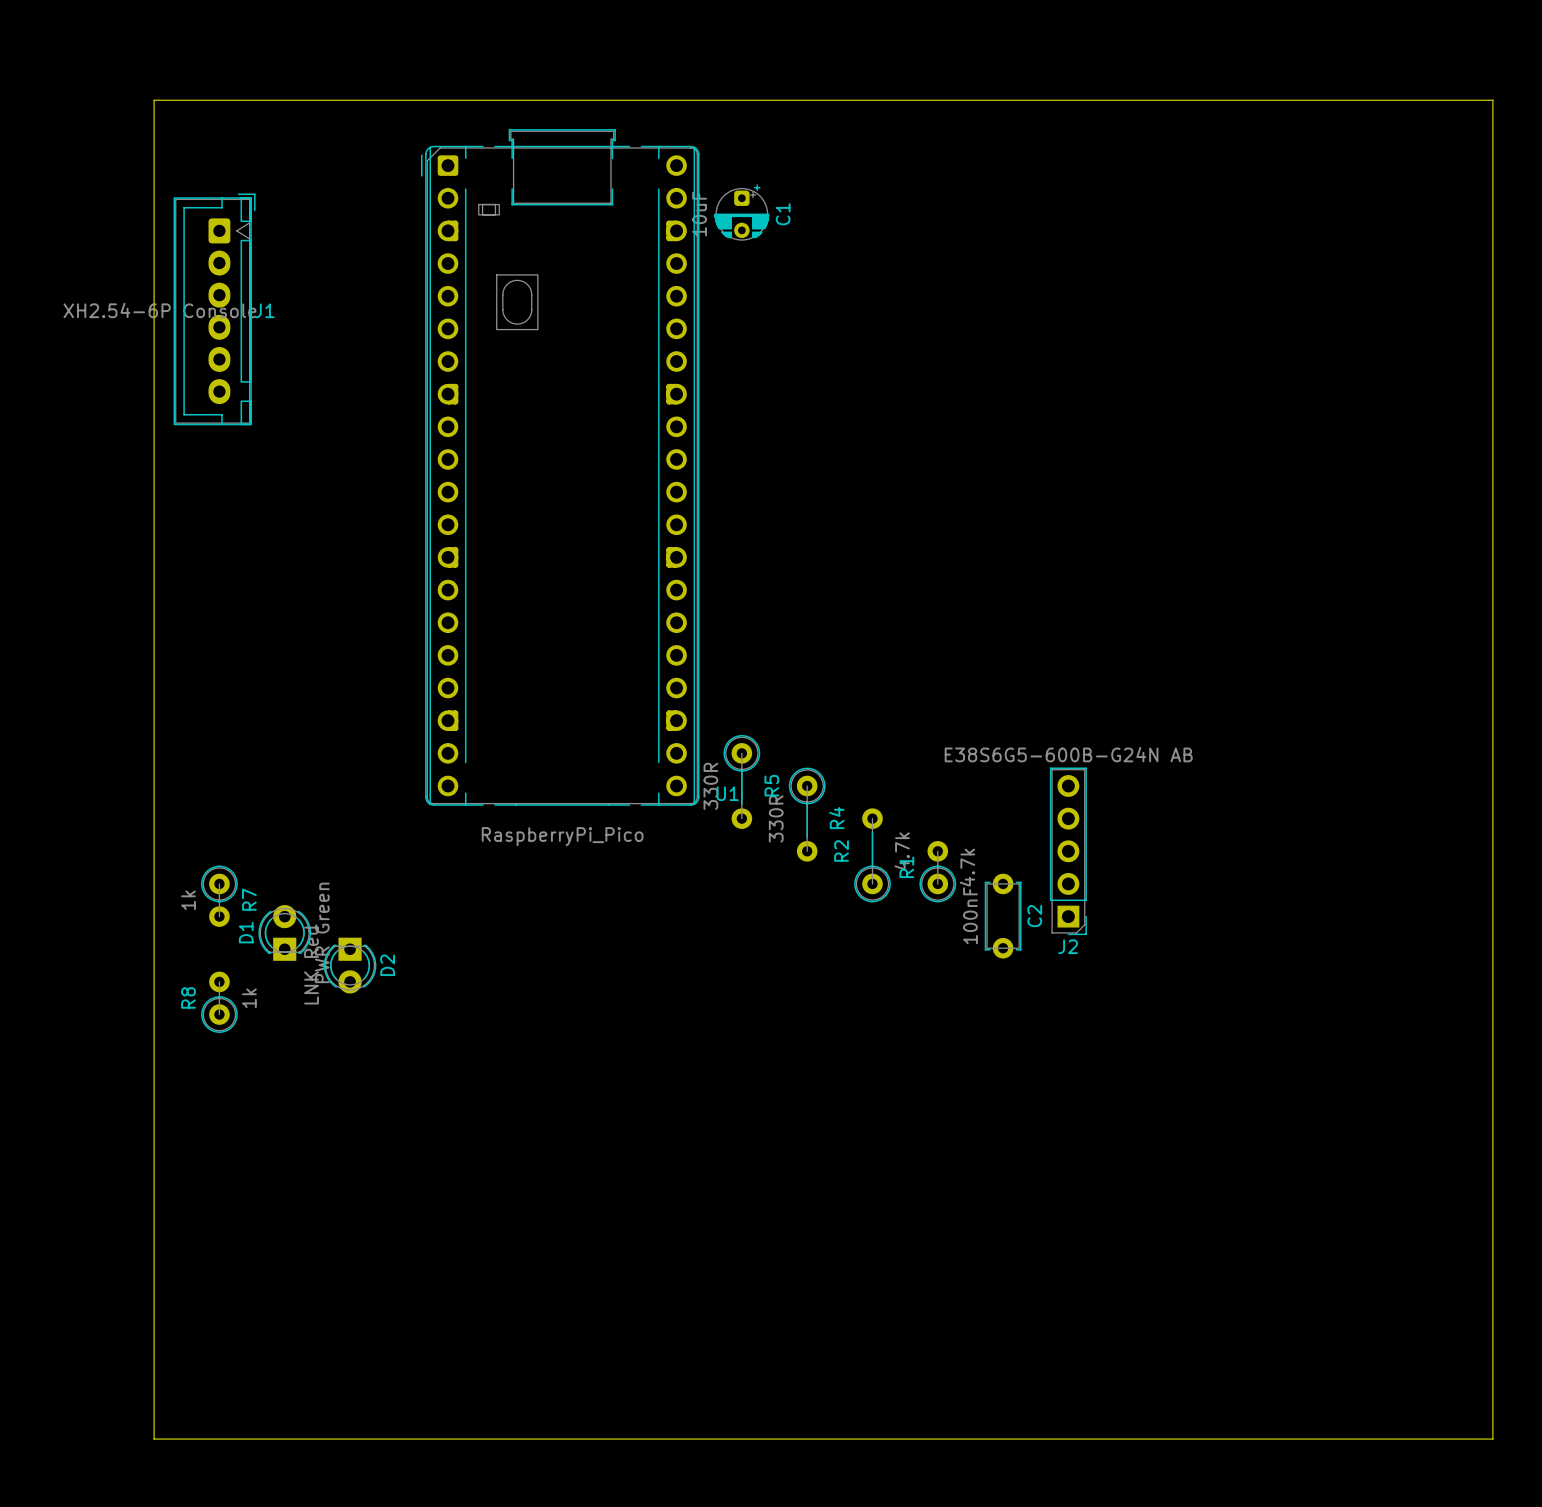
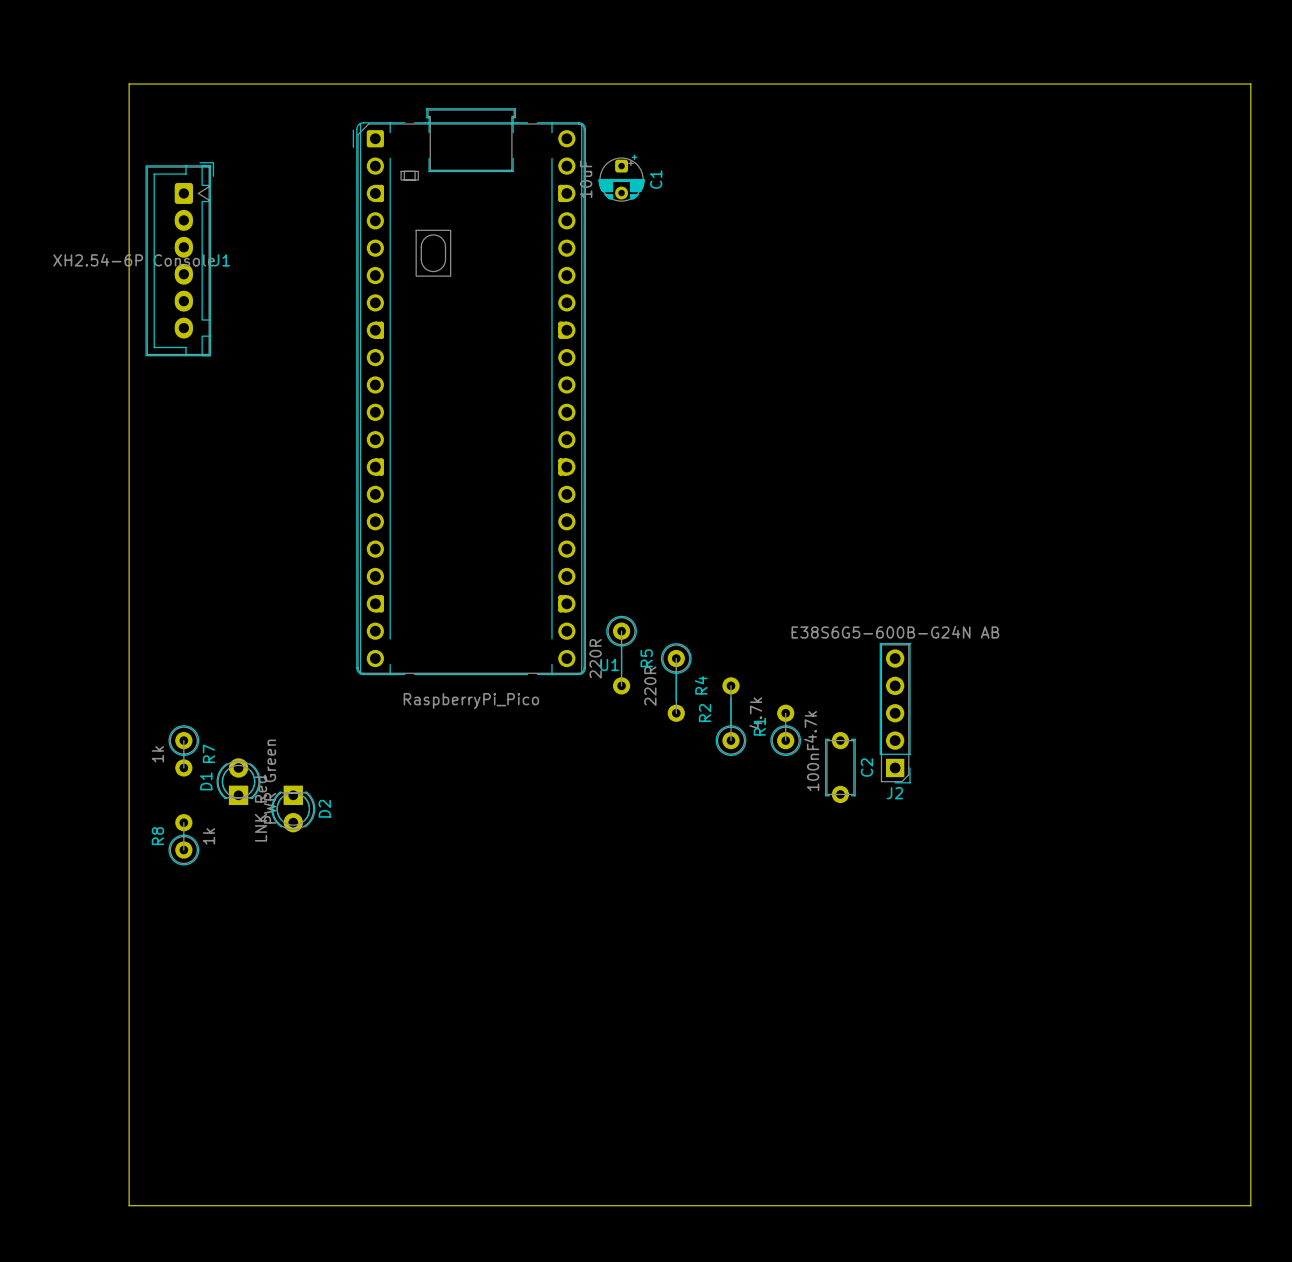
R5 value: 330R (710, 786) -> 220R (595, 658)
R4 value: 330R (776, 818) -> 220R (650, 686)

